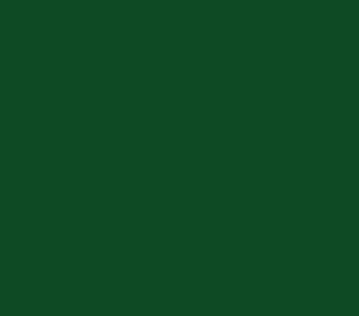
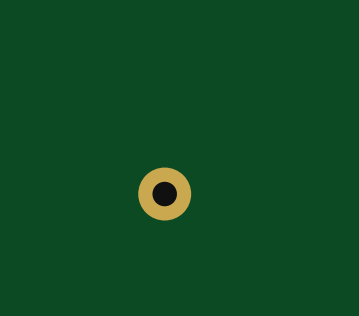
via: none -> (164, 194)

